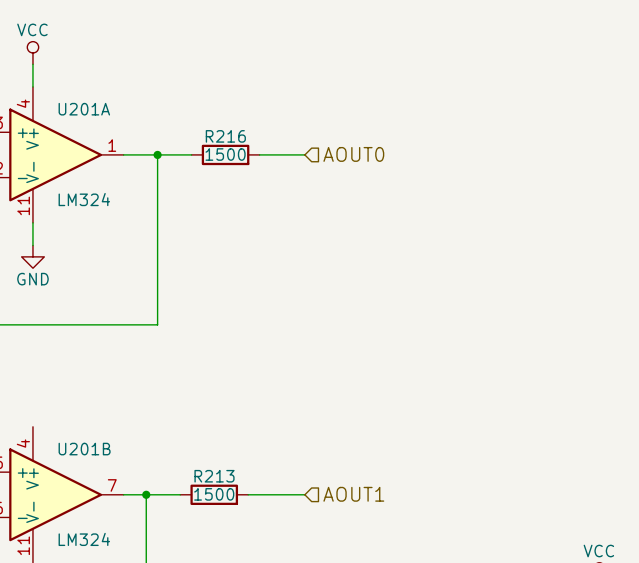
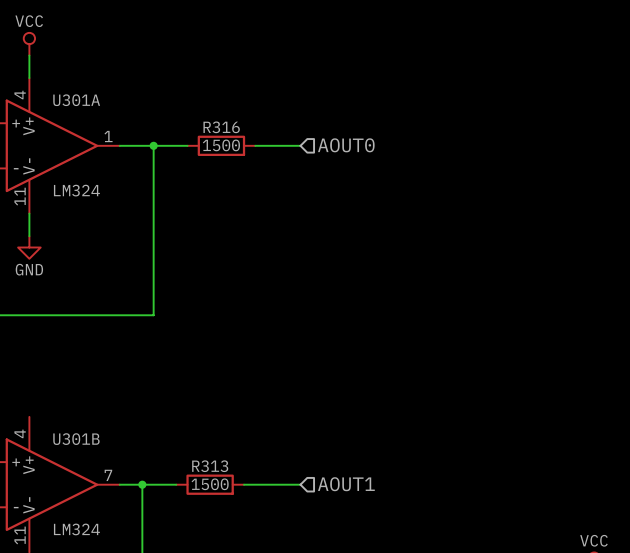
U201A name: U201A (84, 109) -> U301A (76, 100)
R216 name: R216 (225, 136) -> R316 (221, 127)
U201B name: U201B (84, 449) -> U301B (76, 439)
R213 name: R213 (214, 476) -> R313 (210, 466)

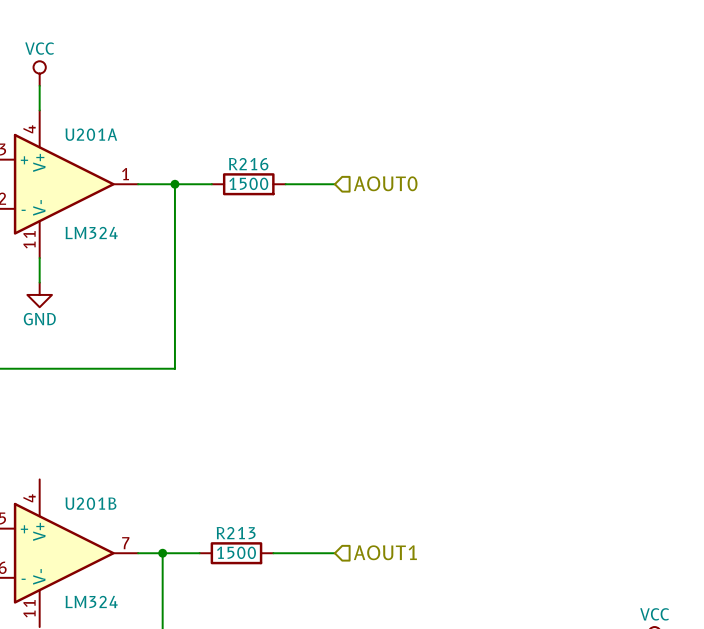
U301A name: U301A (76, 100) -> U201A (91, 134)
R316 name: R316 (221, 127) -> R216 (248, 164)
U301B name: U301B (76, 439) -> U201B (90, 503)
R313 name: R313 (210, 466) -> R213 (236, 533)

